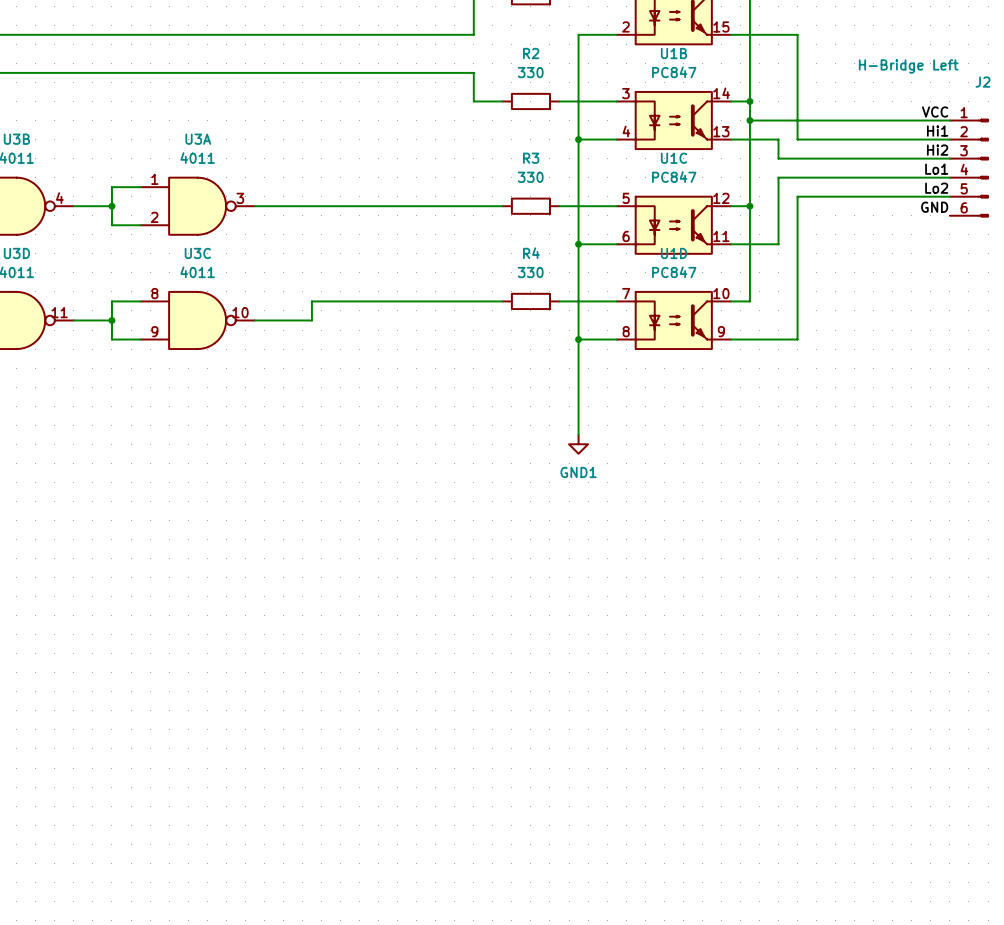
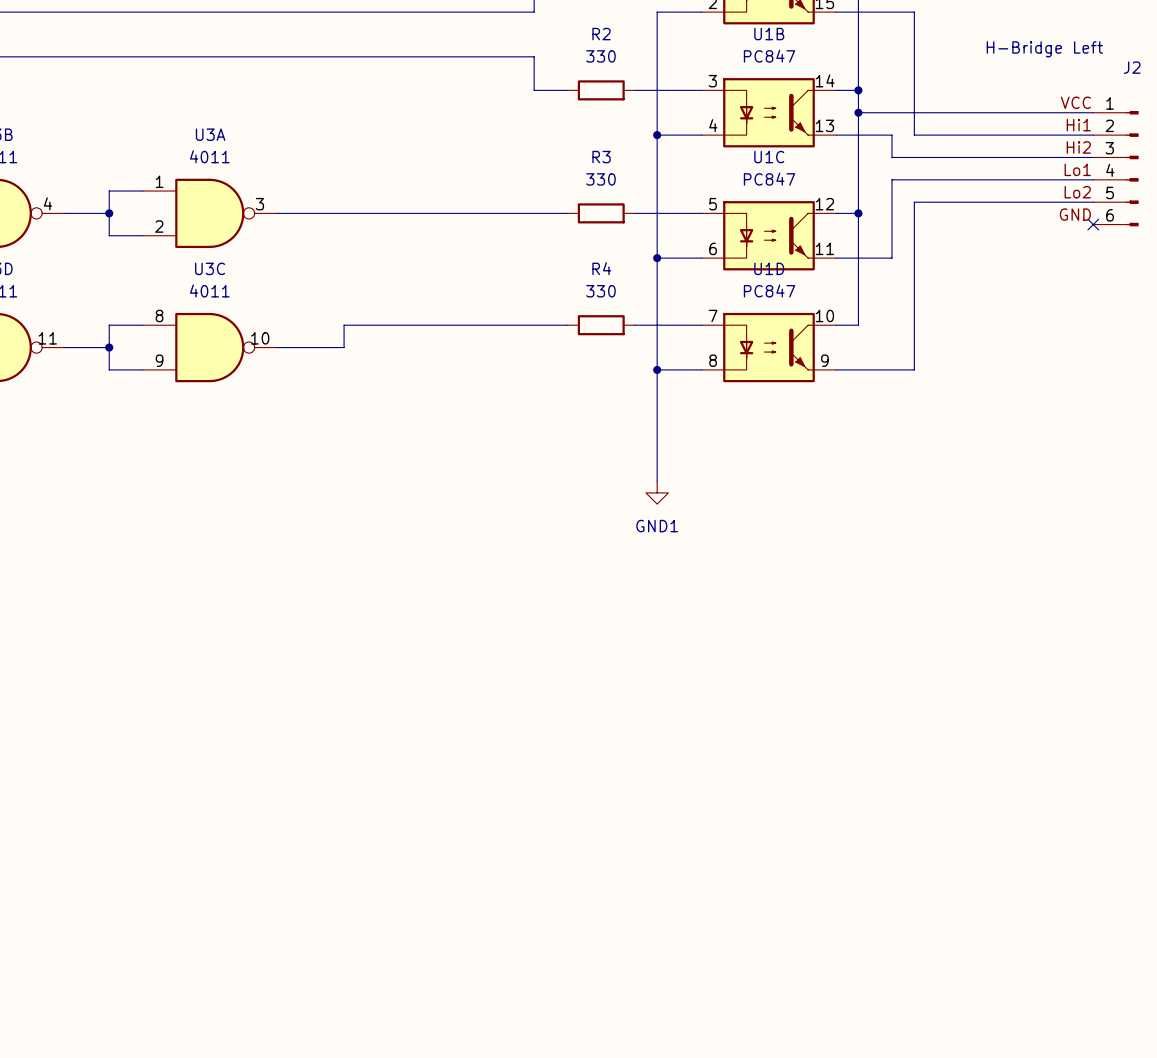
no-connect mark: none -> (1093, 224)

